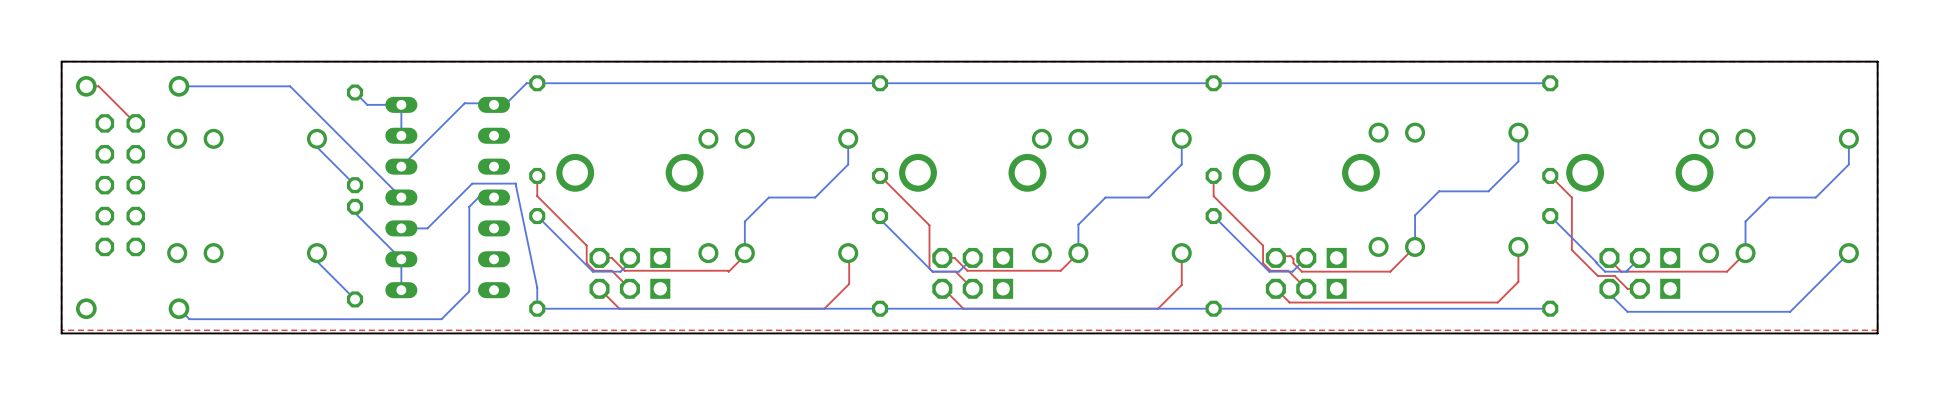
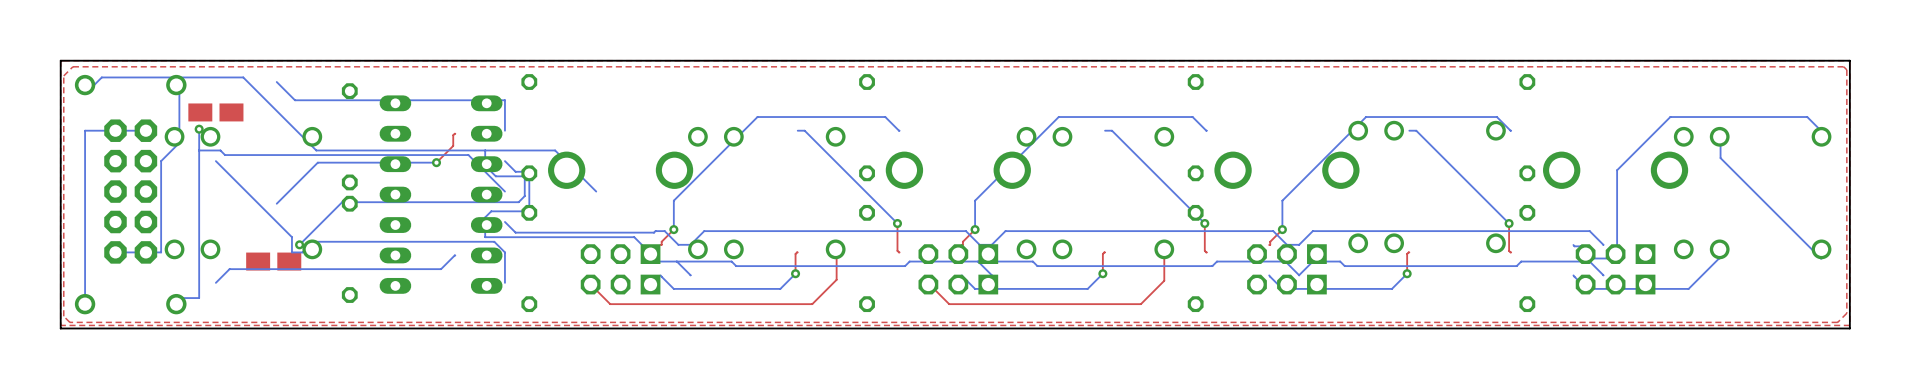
top zone outline: none -> (1843, 66) (72, 66) (63, 75) (63, 316) (69, 322) (1837, 322) (1846, 313) (1846, 69) (1843, 66)
bottom track: none -> (276, 82) (295, 100) (504, 100) (504, 130)
bottom track: (1550, 83) (526, 83) (506, 103) (464, 103) (401, 166) -> none
top track: (86, 86) (98, 86) (135, 123) -> none
bottom track: (178, 86) (290, 86) (401, 197) -> none
bottom track: none -> (88, 91) (101, 77) (243, 77) (316, 150) (555, 150) (596, 191)
bottom track: none -> (179, 91) (179, 142) (161, 161) (161, 252) (115, 252)
bottom track: (355, 92) (367, 104) (401, 104) (401, 135) -> none
part: none -> (215, 112)
bottom track: none -> (199, 129) (199, 298) (176, 298)
via: none -> (199, 129)
bottom track: none -> (145, 130) (85, 130) (85, 298)
bottom track: none -> (797, 130) (804, 130) (897, 223)
bottom track: none -> (899, 130) (885, 117) (757, 117) (673, 200) (673, 229)
bottom track: none -> (1105, 130) (1112, 130) (1204, 223)
bottom track: none -> (1206, 130) (1192, 117) (1058, 117) (975, 200) (975, 229)
bottom track: none -> (1409, 130) (1416, 130) (1509, 223)
bottom track: (1518, 132) (1518, 161) (1488, 191) (1439, 191) (1415, 215) (1415, 246) -> none
bottom track: none -> (1511, 130) (1496, 117) (1366, 117) (1282, 200) (1282, 229)
bottom track: none -> (1719, 130) (1720, 158) (1821, 258)
bottom track: none -> (1821, 130) (1807, 117) (1670, 117) (1617, 170) (1617, 258) (1592, 258) (1580, 246) (1573, 244)
top track: none -> (455, 133) (453, 135) (453, 145) (436, 162)
bottom track: (317, 138) (317, 147) (355, 185) -> none
bottom track: (848, 138) (848, 164) (815, 197) (768, 197) (744, 221) (744, 253) -> none
bottom track: (1181, 138) (1181, 164) (1148, 197) (1105, 197) (1078, 224) (1078, 253) -> none
bottom track: (1848, 138) (1848, 164) (1815, 197) (1769, 197) (1745, 221) (1745, 253) -> none
bottom track: none -> (199, 150) (220, 150) (225, 155) (468, 155) (504, 191)
bottom track: none -> (485, 150) (485, 165) (495, 176) (524, 176) (524, 196) (518, 202) (342, 202) (299, 244)
bottom track: none -> (215, 161) (291, 237) (291, 252) (302, 252) (313, 241) (494, 241) (504, 252) (504, 282)
bottom track: none -> (504, 161) (515, 171) (526, 171) (529, 174) (529, 211) (491, 211) (485, 217) (485, 237) (634, 237) (658, 261) (731, 261) (736, 266) (905, 266) (909, 261) (1032, 261) (1037, 266) (1212, 266) (1216, 261) (1285, 261) (1299, 275) (1312, 261) (1340, 261) (1344, 266) (1516, 266) (1521, 261) (1589, 261) (1603, 275)
bottom track: none -> (436, 162) (317, 162) (276, 203)
via: none -> (436, 162)
top track: (537, 175) (537, 196) (586, 245) (586, 263) (594, 270) (611, 270) (629, 288) -> none
top track: (880, 175) (929, 225) (929, 268) (932, 271) (955, 271) (972, 288) -> none
top track: (1213, 175) (1213, 196) (1263, 245) (1263, 263) (1270, 270) (1288, 270) (1306, 288) -> none
top track: (1550, 175) (1571, 197) (1571, 250) (1597, 276) (1614, 276) (1627, 288) (1639, 288) -> none
part: (120, 185) -> none
part: none -> (130, 191)
bottom track: (494, 197) (478, 197) (469, 206) (469, 291) (441, 319) (189, 319) (178, 308) -> none
bottom track: (355, 206) (355, 212) (401, 259) (401, 290) -> none
bottom track: (537, 216) (592, 271) (620, 271) (629, 262) (629, 257) -> none
bottom track: (880, 216) (880, 219) (932, 271) (959, 271) (972, 257) -> none
bottom track: (1213, 216) (1269, 271) (1292, 271) (1306, 257) -> none
bottom track: (1550, 216) (1605, 271) (1627, 271) (1639, 257) -> none
bottom track: none -> (504, 221) (515, 232) (664, 231) (678, 244) (690, 244) (704, 231) (965, 231) (979, 244) (991, 244) (1005, 231) (1273, 231) (1286, 244) (1299, 244) (1312, 231) (1589, 231) (1603, 244)
top track: none -> (897, 223) (897, 250) (899, 252)
via: none -> (897, 223)
top track: none -> (1204, 223) (1204, 250) (1206, 252)
via: none -> (1204, 223)
top track: none -> (1509, 223) (1509, 250) (1511, 252)
via: none -> (1509, 223)
bottom track: (401, 228) (427, 228) (472, 183) (515, 183) (537, 287) (537, 308) (1550, 308) -> none
top track: none -> (673, 229) (660, 244)
via: none -> (673, 229)
top track: none -> (975, 229) (961, 244)
via: none -> (975, 229)
top track: none -> (1282, 229) (1269, 244)
via: none -> (1282, 229)
top track: (1415, 246) (1390, 271) (1301, 271) (1293, 263) (1293, 258) (1290, 256) (1277, 256) (1275, 257) -> none
top track: (1518, 246) (1518, 281) (1497, 302) (1289, 302) (1275, 288) -> none
via: none -> (299, 244)
bottom track: (317, 253) (317, 261) (355, 299) -> none
top track: (744, 253) (744, 255) (728, 271) (624, 270) (611, 257) (599, 257) -> none
top track: (1078, 253) (1060, 270) (967, 270) (954, 257) (942, 257) -> none
top track: (1745, 253) (1726, 271) (1621, 271) (1609, 257) -> none
bottom track: (1848, 253) (1790, 311) (1627, 311) (1609, 293) (1609, 288) -> none
top track: none -> (797, 252) (795, 253) (795, 273)
top track: none -> (1105, 252) (1102, 253) (1102, 273)
top track: none -> (1409, 252) (1407, 253) (1407, 273)
bottom track: none -> (455, 255) (441, 269) (229, 269) (215, 282)
bottom track: none -> (1719, 258) (1688, 288) (1586, 288) (1573, 275)
part: none -> (273, 261)
bottom track: none -> (676, 261) (690, 275)
bottom track: none -> (978, 261) (991, 275)
bottom track: none -> (795, 273) (780, 288) (673, 288) (660, 275)
via: none -> (795, 273)
bottom track: none -> (1102, 273) (1087, 288) (975, 288) (961, 275)
via: none -> (1102, 273)
bottom track: none -> (1407, 273) (1391, 288) (1282, 288) (1269, 275)
via: none -> (1407, 273)

